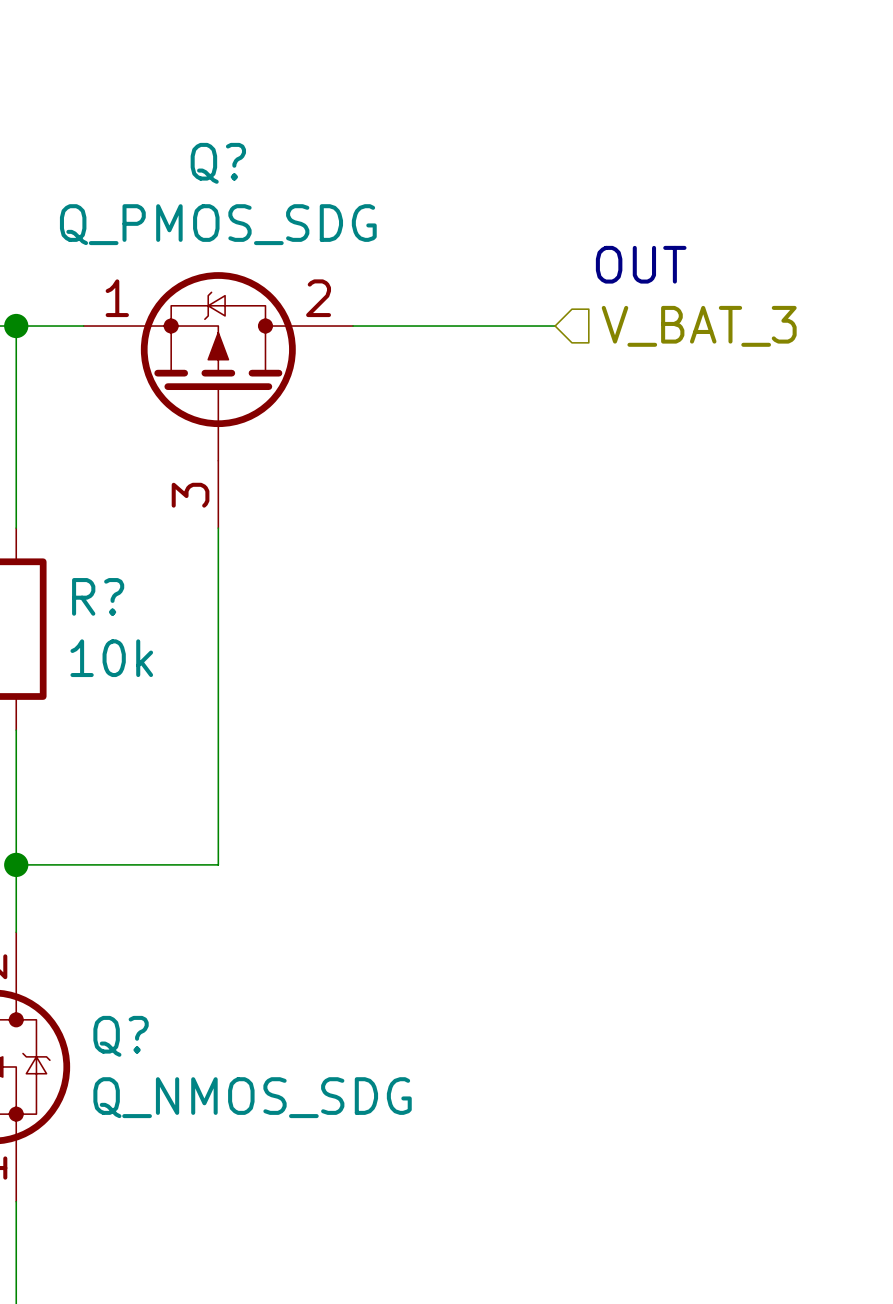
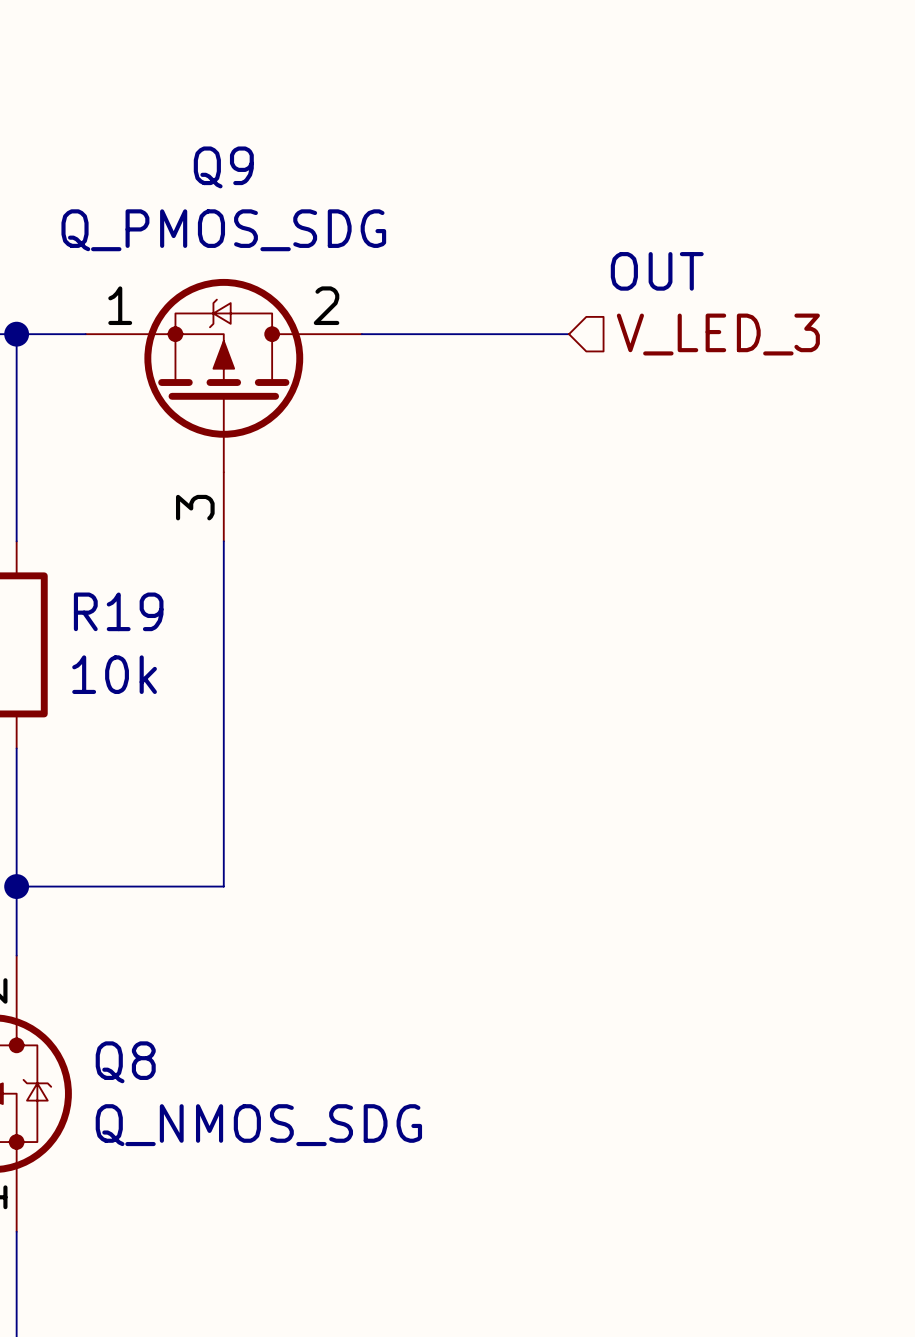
Q? name: Q? (218, 163) -> Q9 (223, 167)
hierarchical label: V_BAT_3 (699, 326) -> V_LED_3 (718, 334)
R? name: R? (98, 596) -> R19 (118, 611)
Q? name: Q? (121, 1036) -> Q8 (125, 1062)

